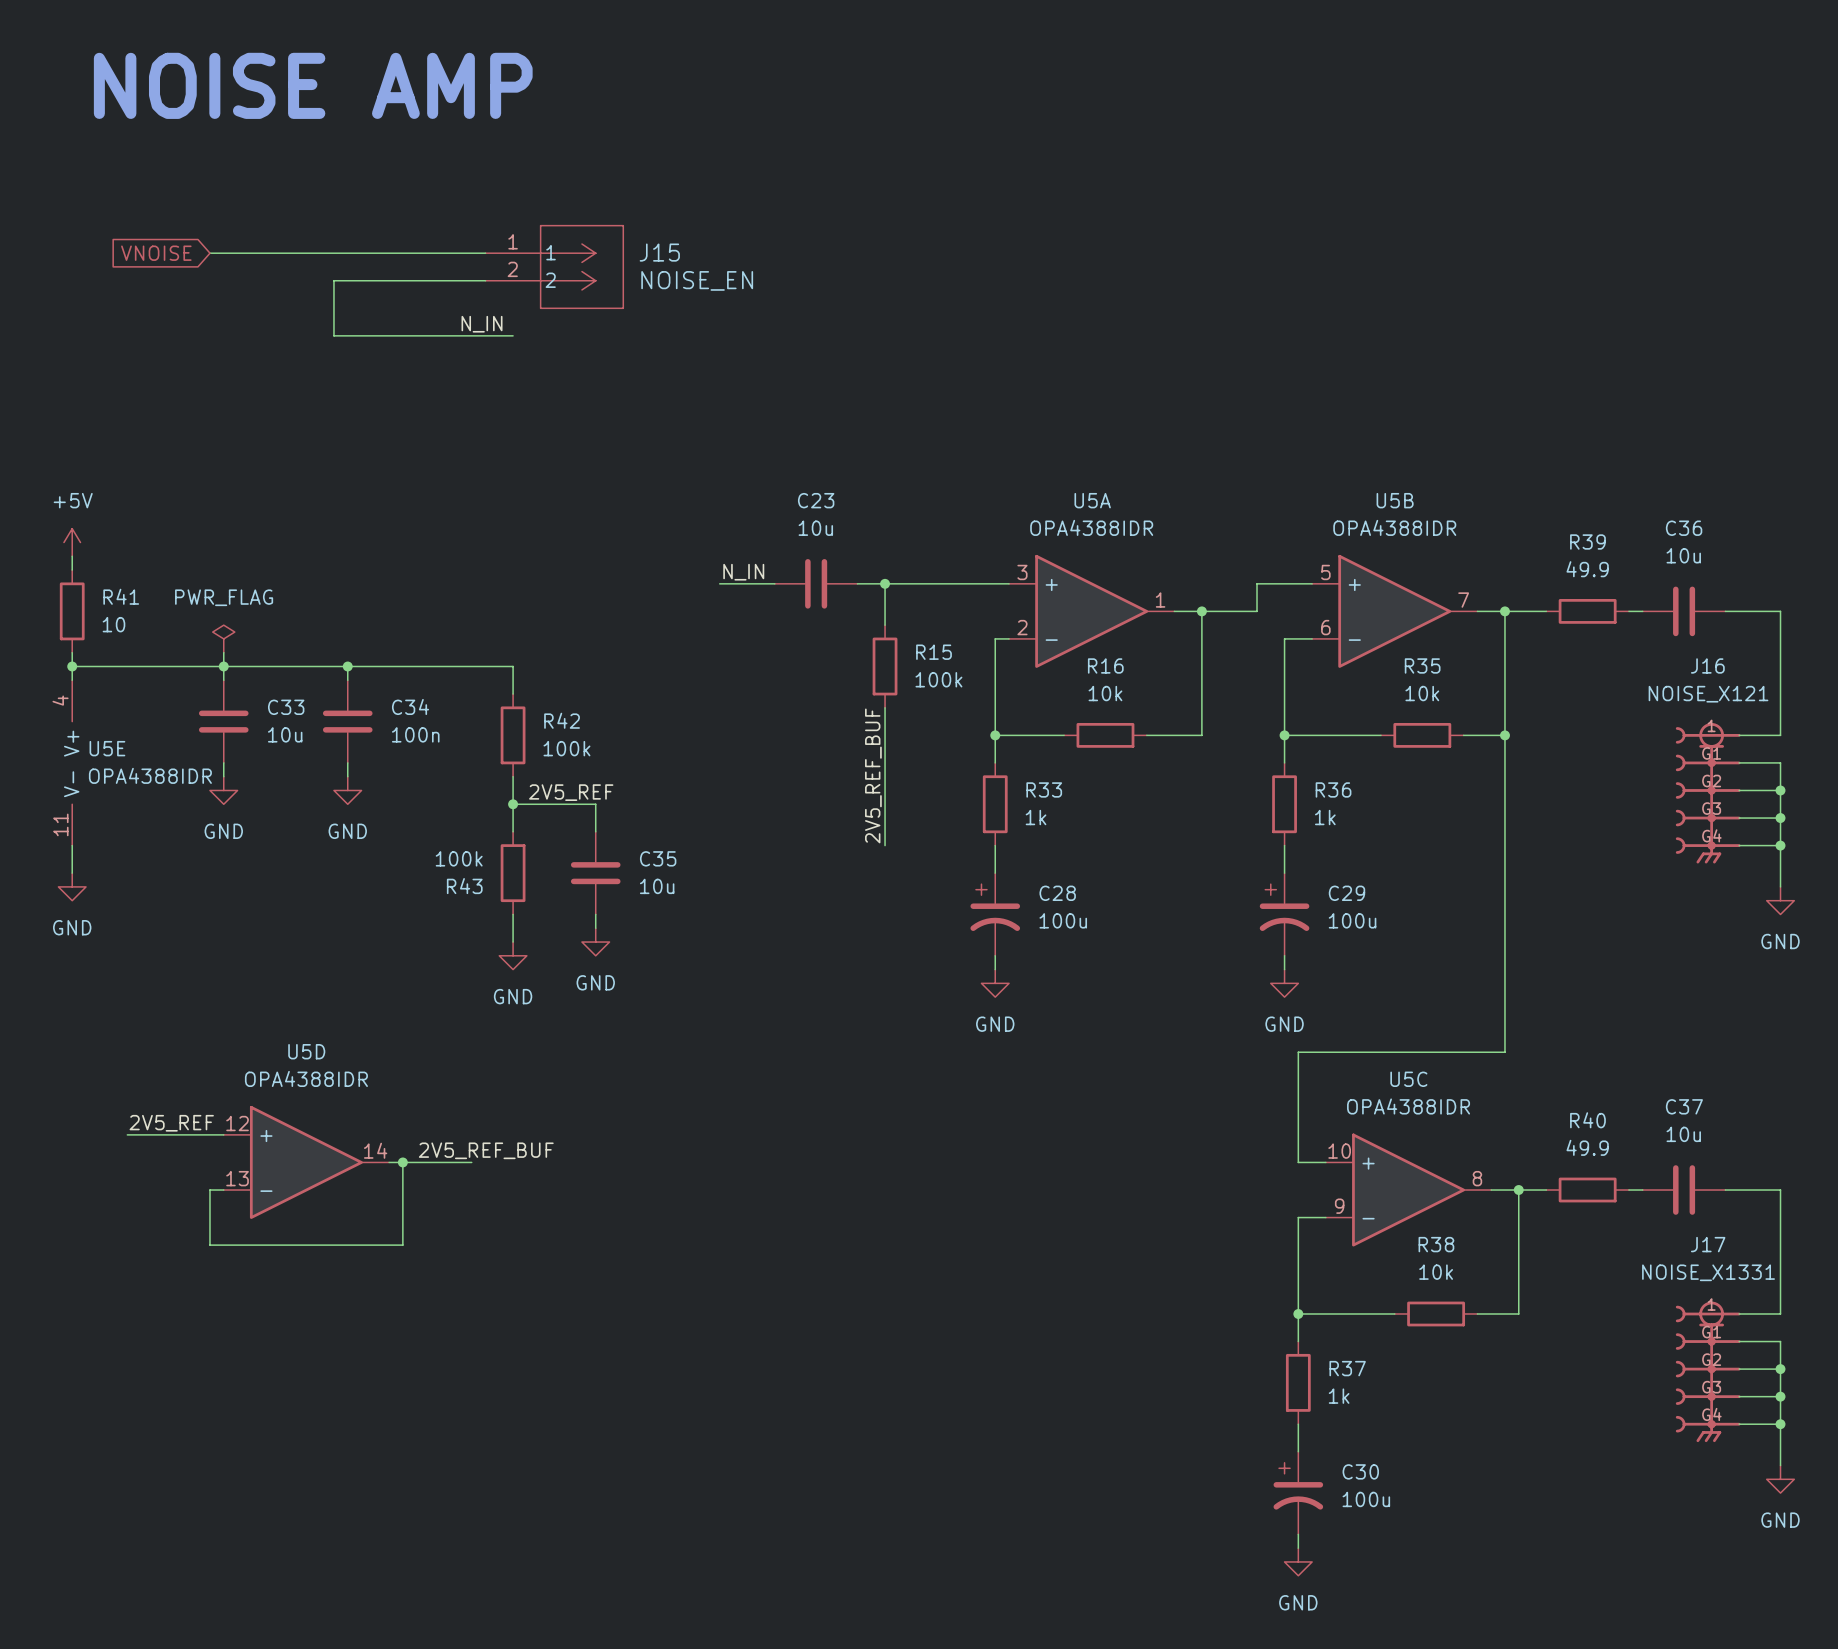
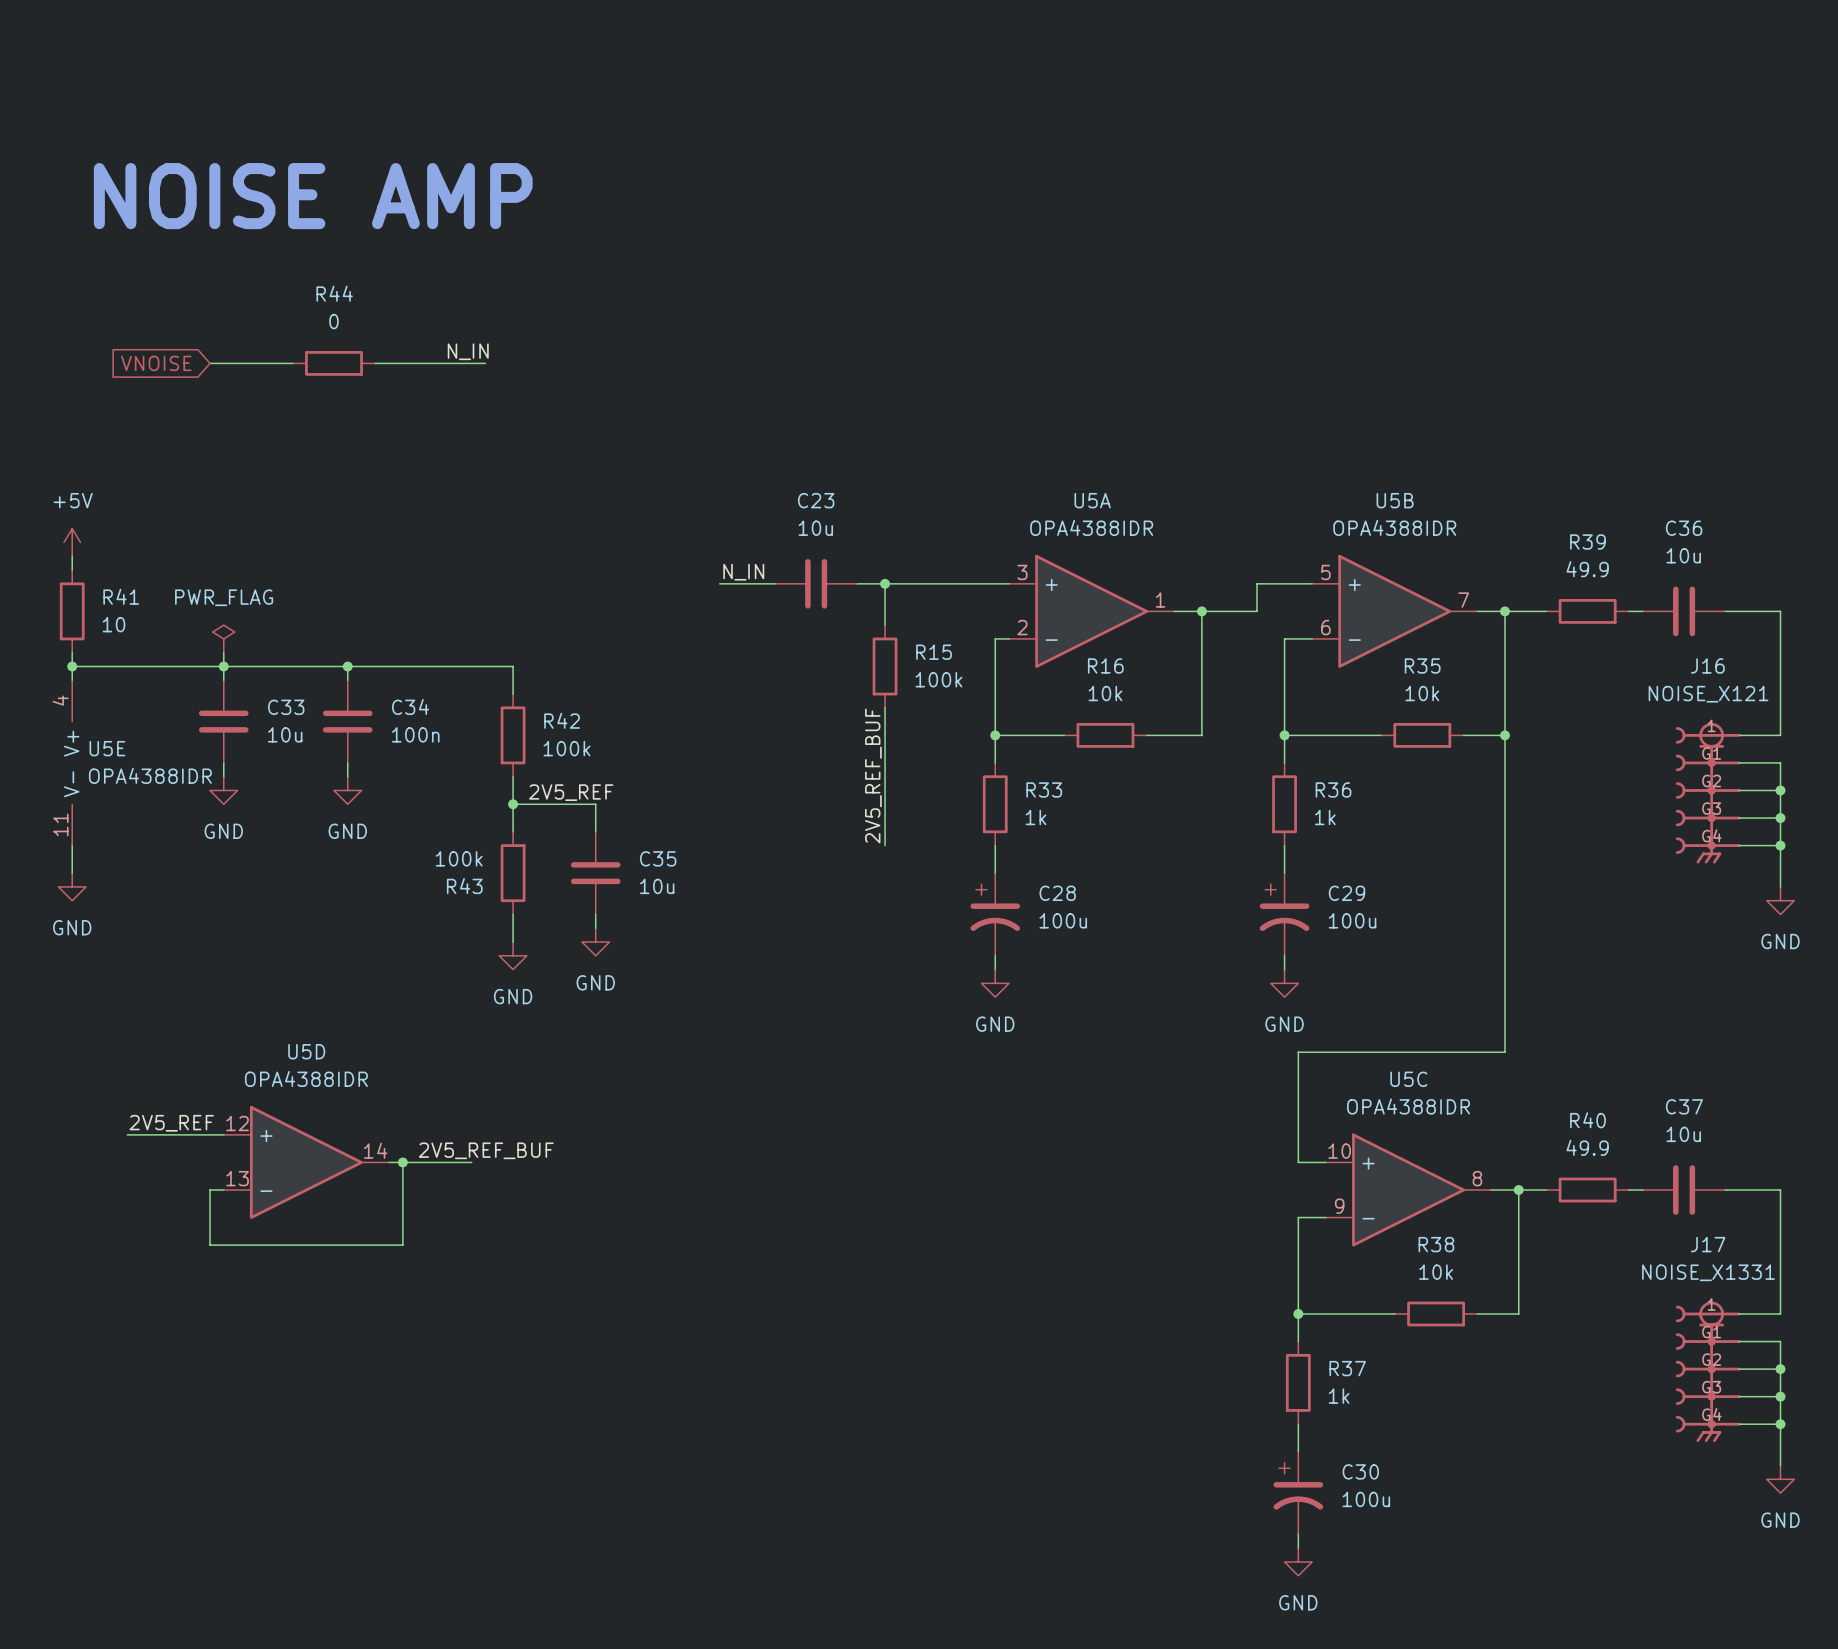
text position: NOISE AMP (313, 85) -> NOISE AMP (313, 196)
global label position: VNOISE (156, 253) -> VNOISE (156, 363)
wire: (209, 253) (485, 253) -> none
J15: NOISE_EN (554, 266) -> none
wire: (485, 280) (333, 280) (333, 335) (513, 335) -> none
label position: N_IN (482, 324) -> N_IN (468, 351)
wire: none -> (209, 363) (292, 363)
R44: none -> 0 (333, 363)
wire: none -> (375, 363) (485, 363)

